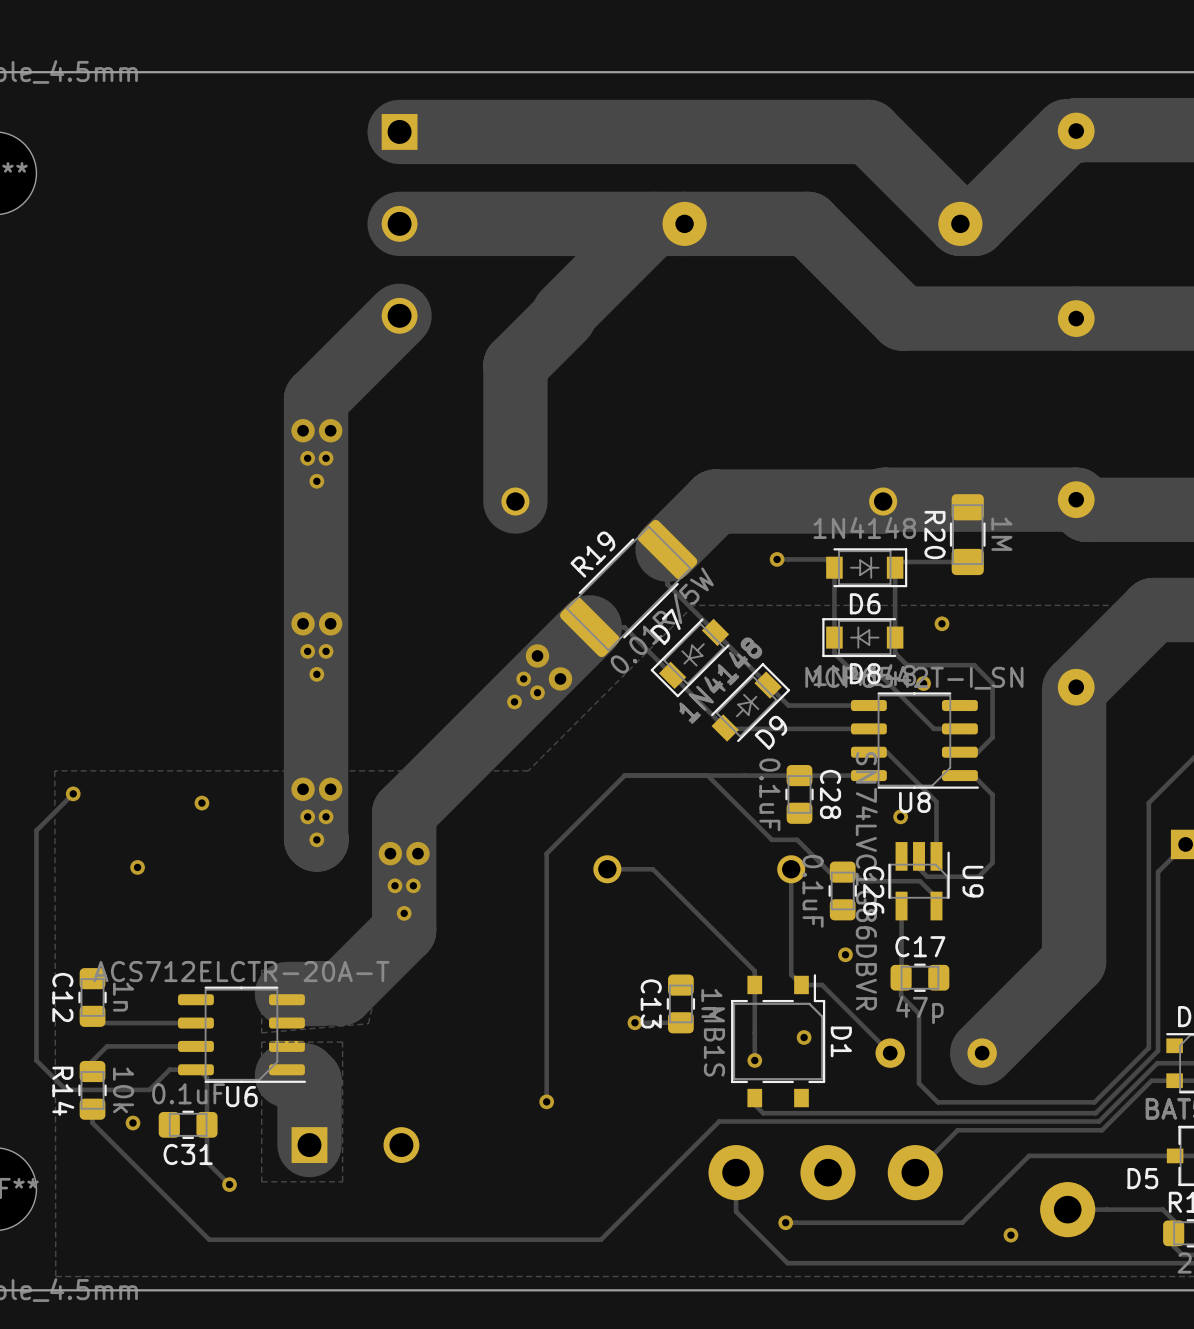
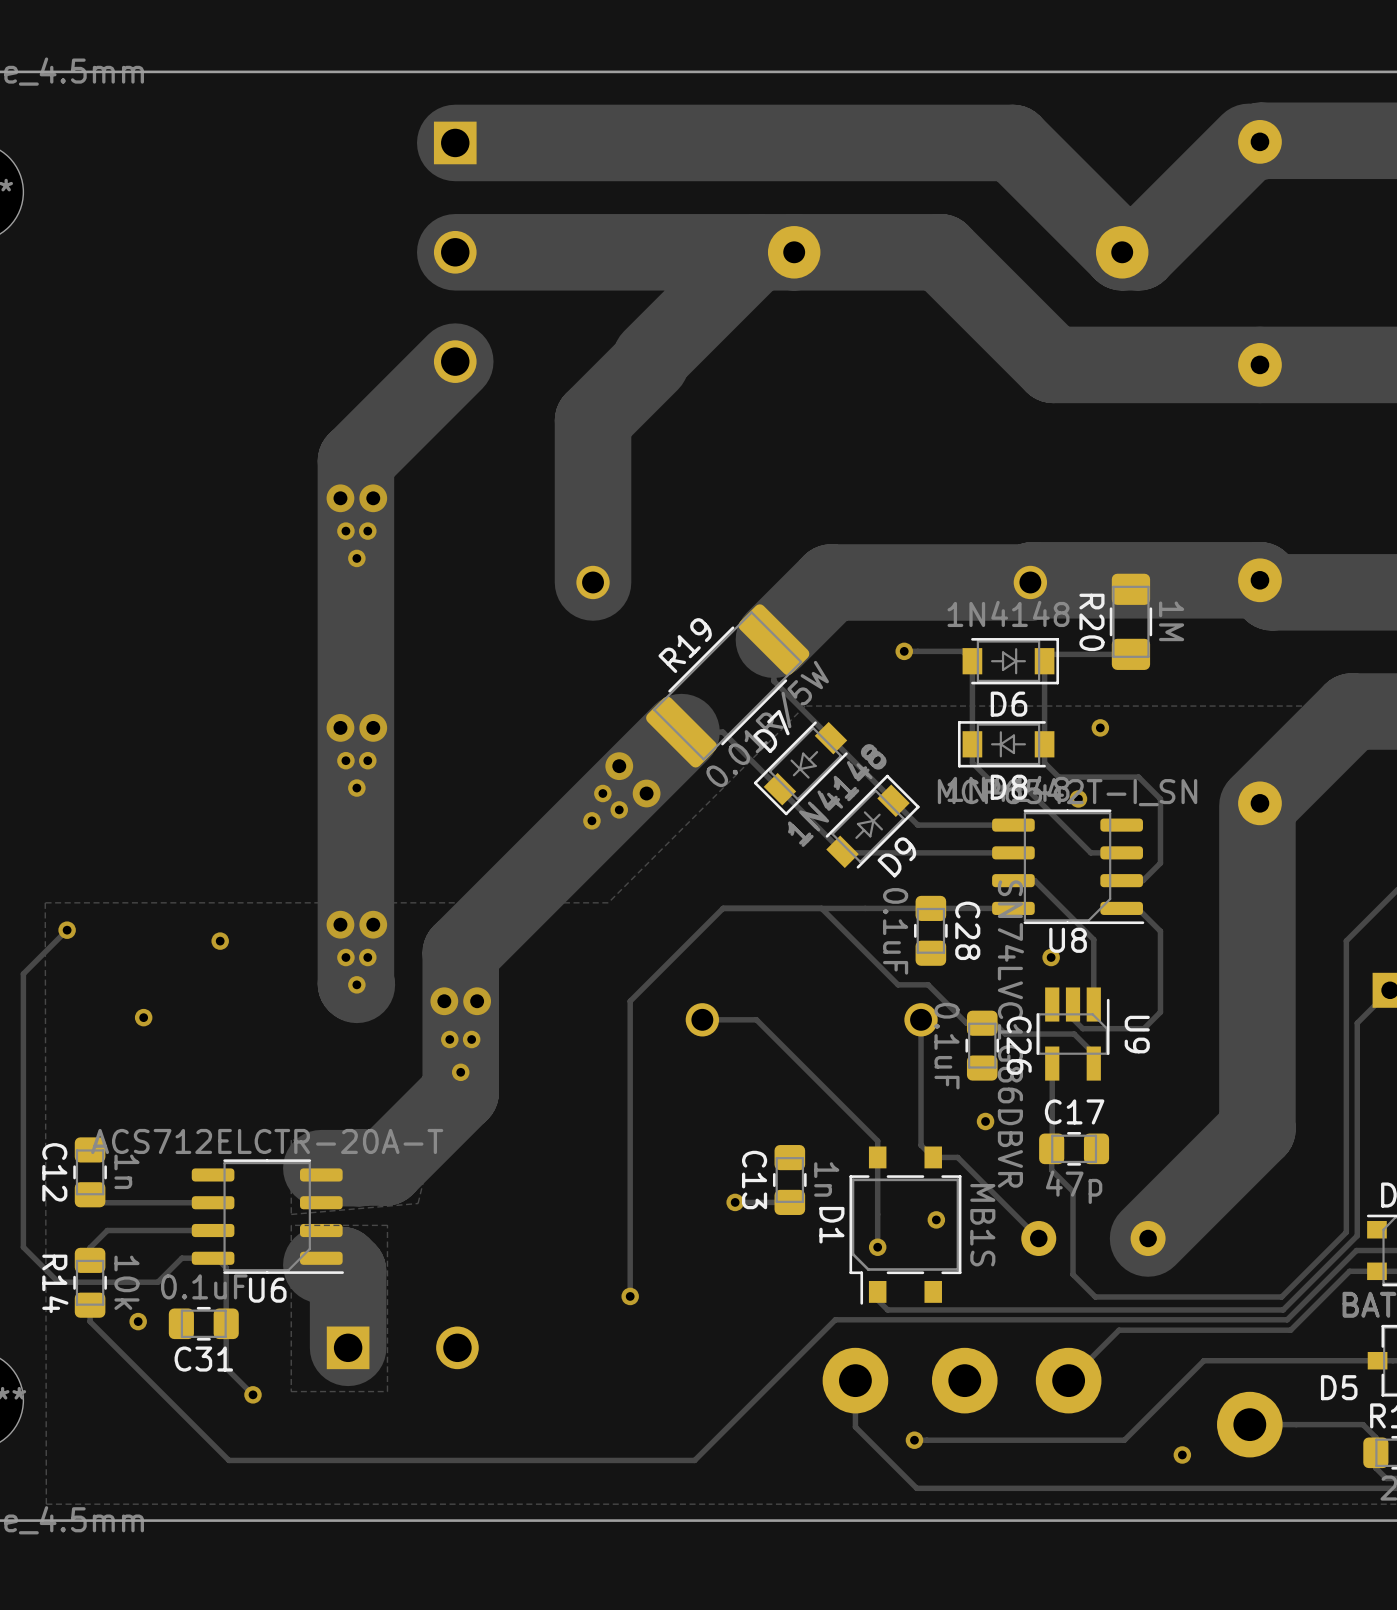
D1 rotation: 0° (778, 1040) -> 180° (905, 1225)

